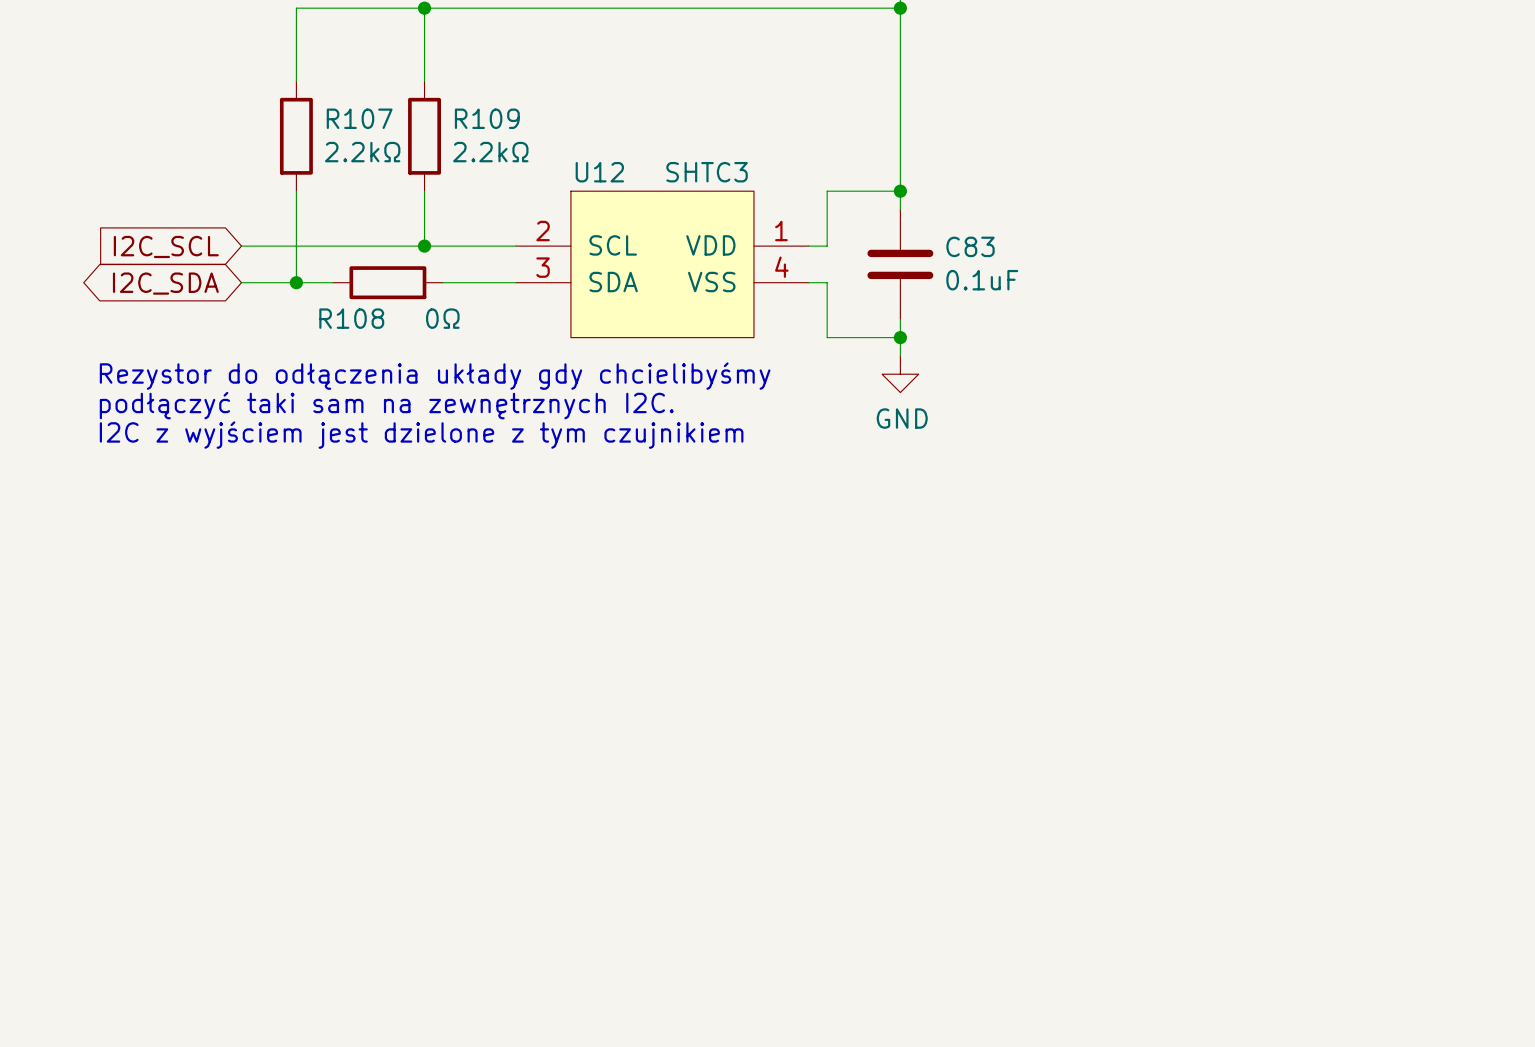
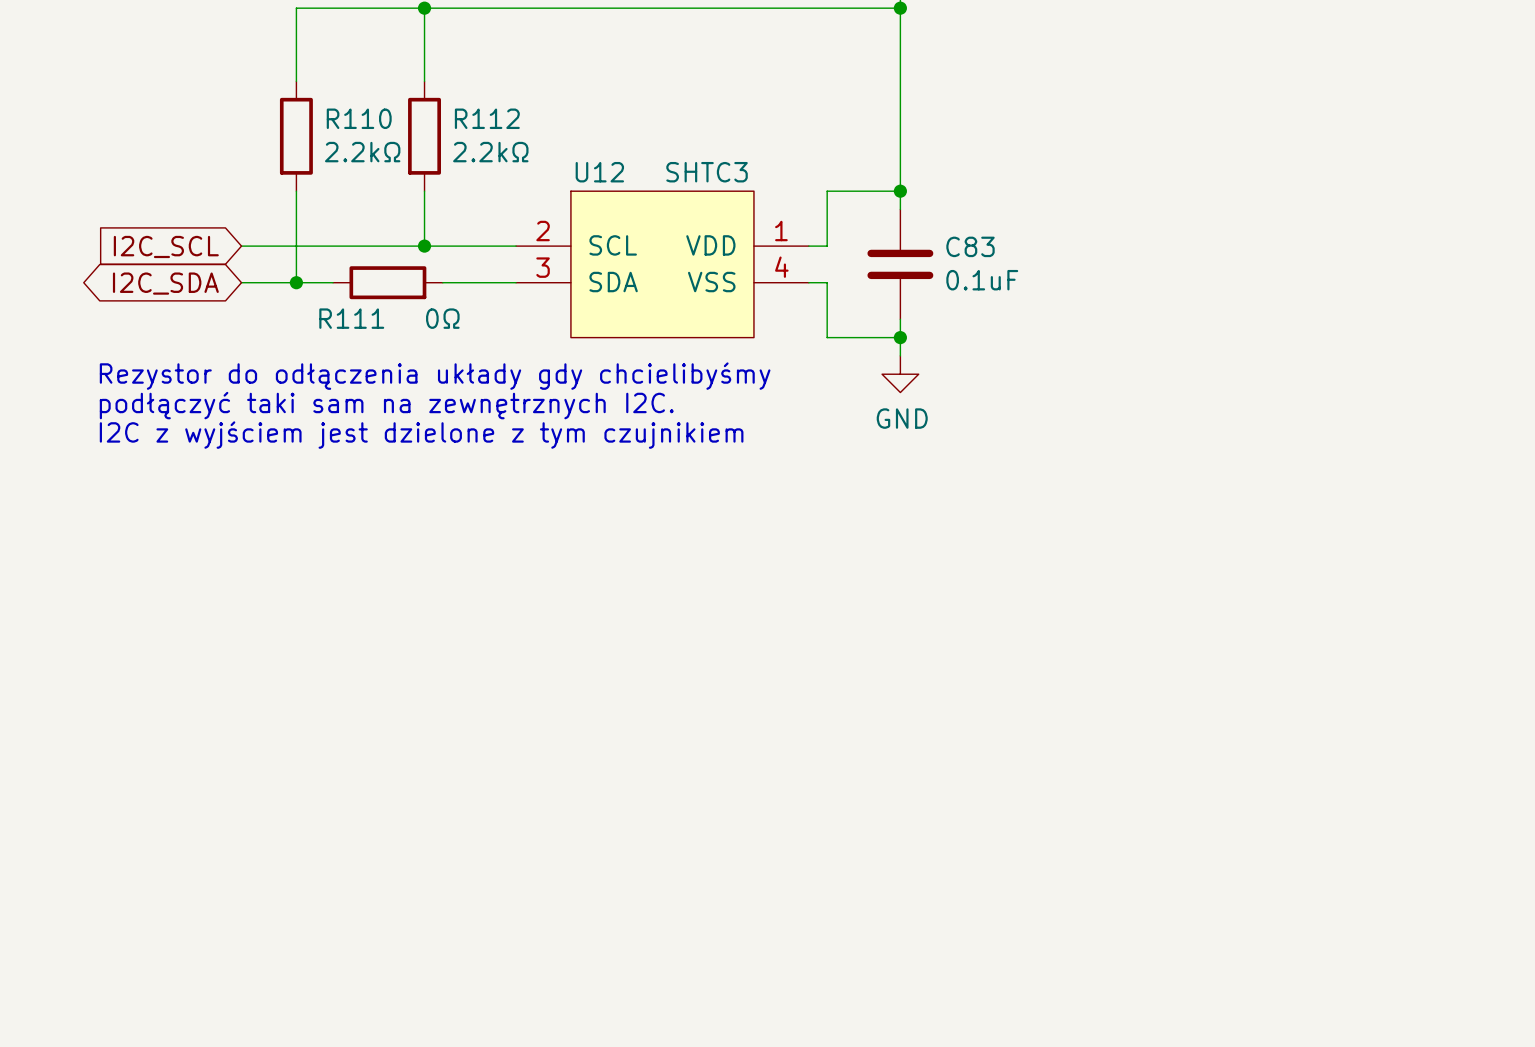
R107 name: R107 (359, 118) -> R110 (359, 118)
R109 name: R109 (487, 118) -> R112 (487, 118)
R108 name: R108 (351, 318) -> R111 (351, 318)

